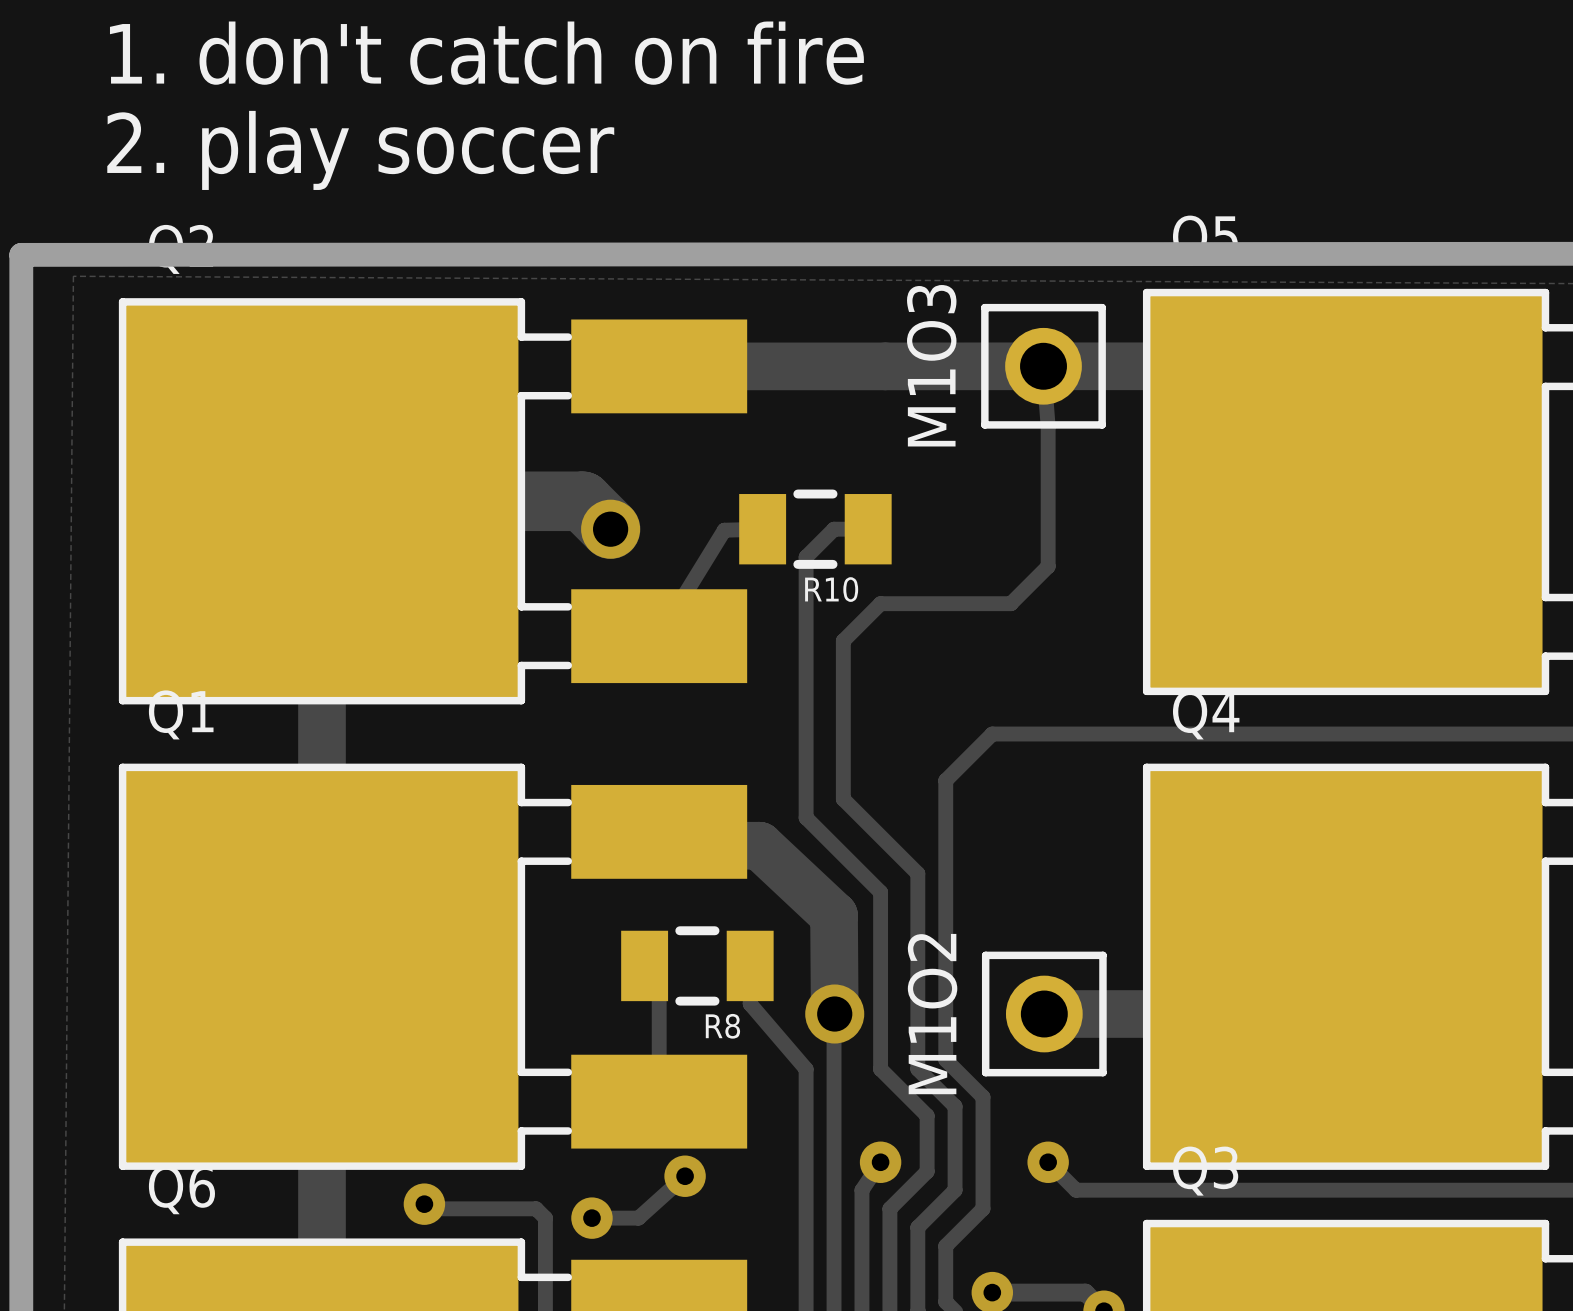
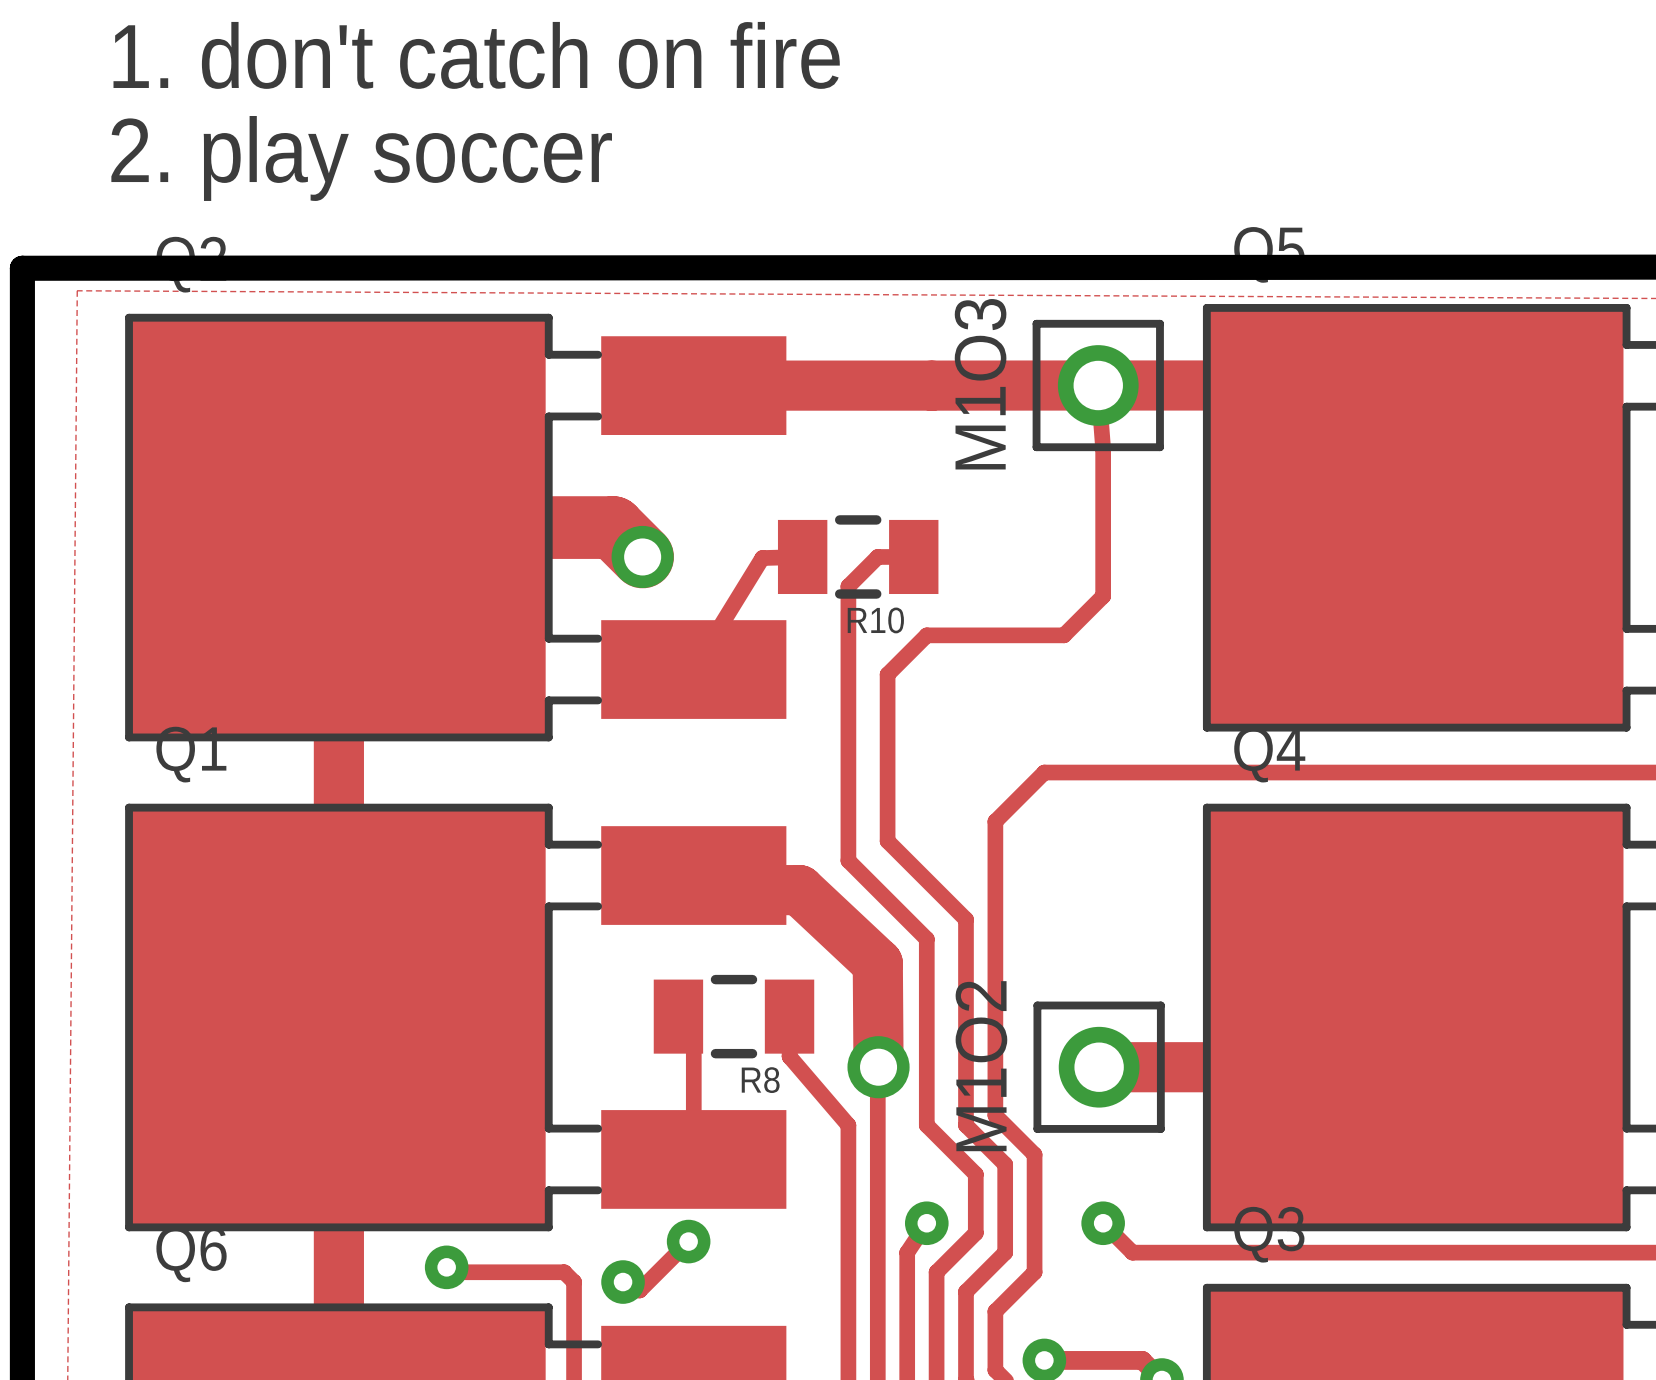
track: (685, 1176) (638, 1218) (591, 1218) -> none
via position: (685, 1176) -> (688, 1241)
track: none -> (688, 1241) (639, 1290) (613, 1290)

